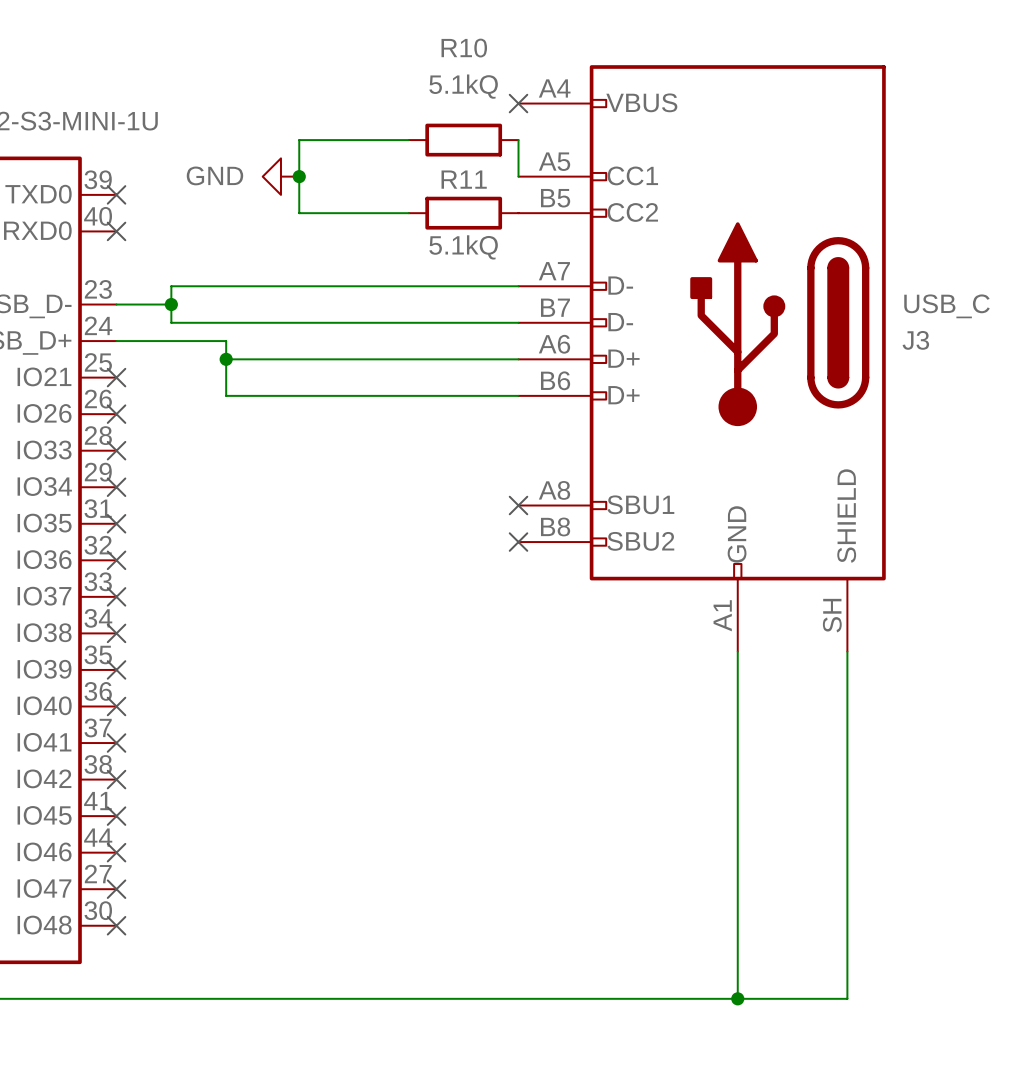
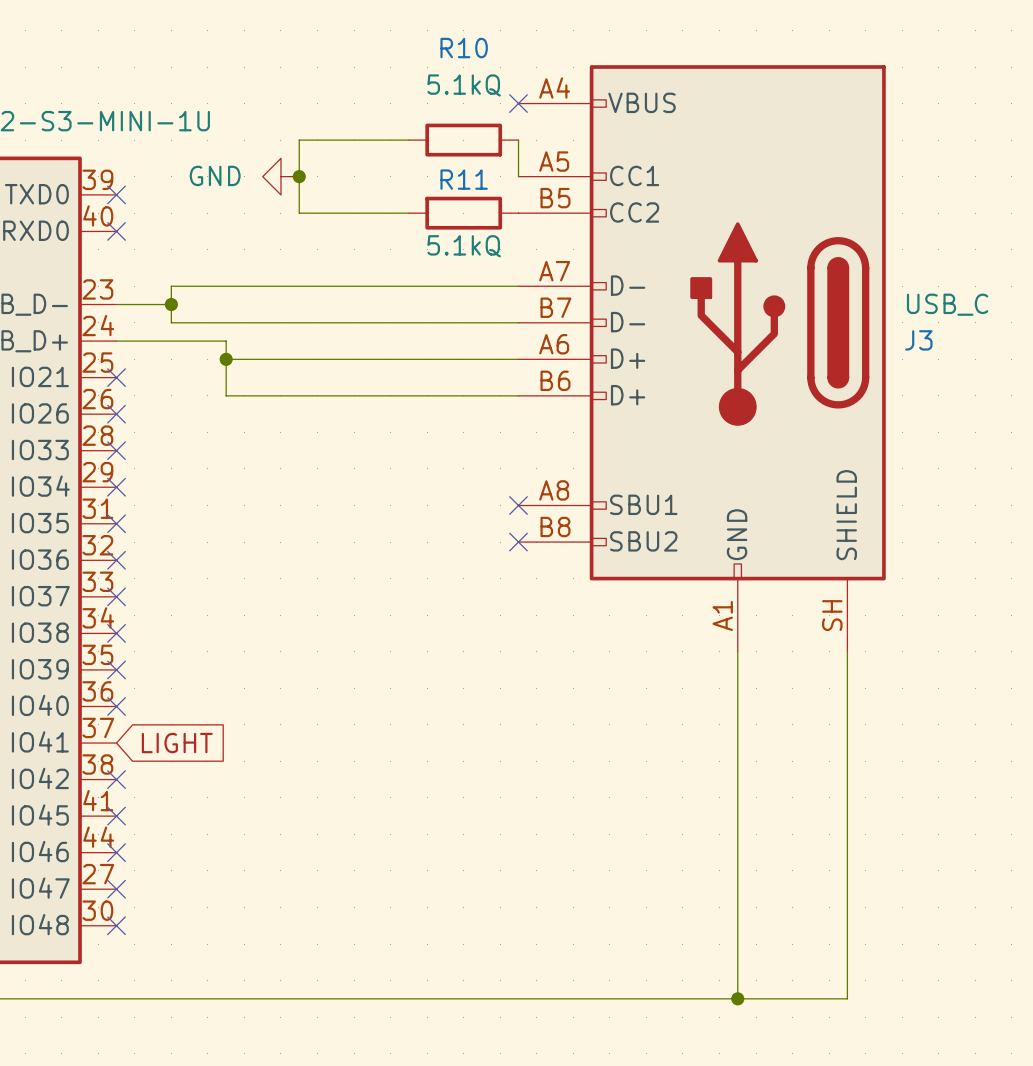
no-connect mark: (116, 743) -> none
global label: none -> LIGHT (177, 743)

